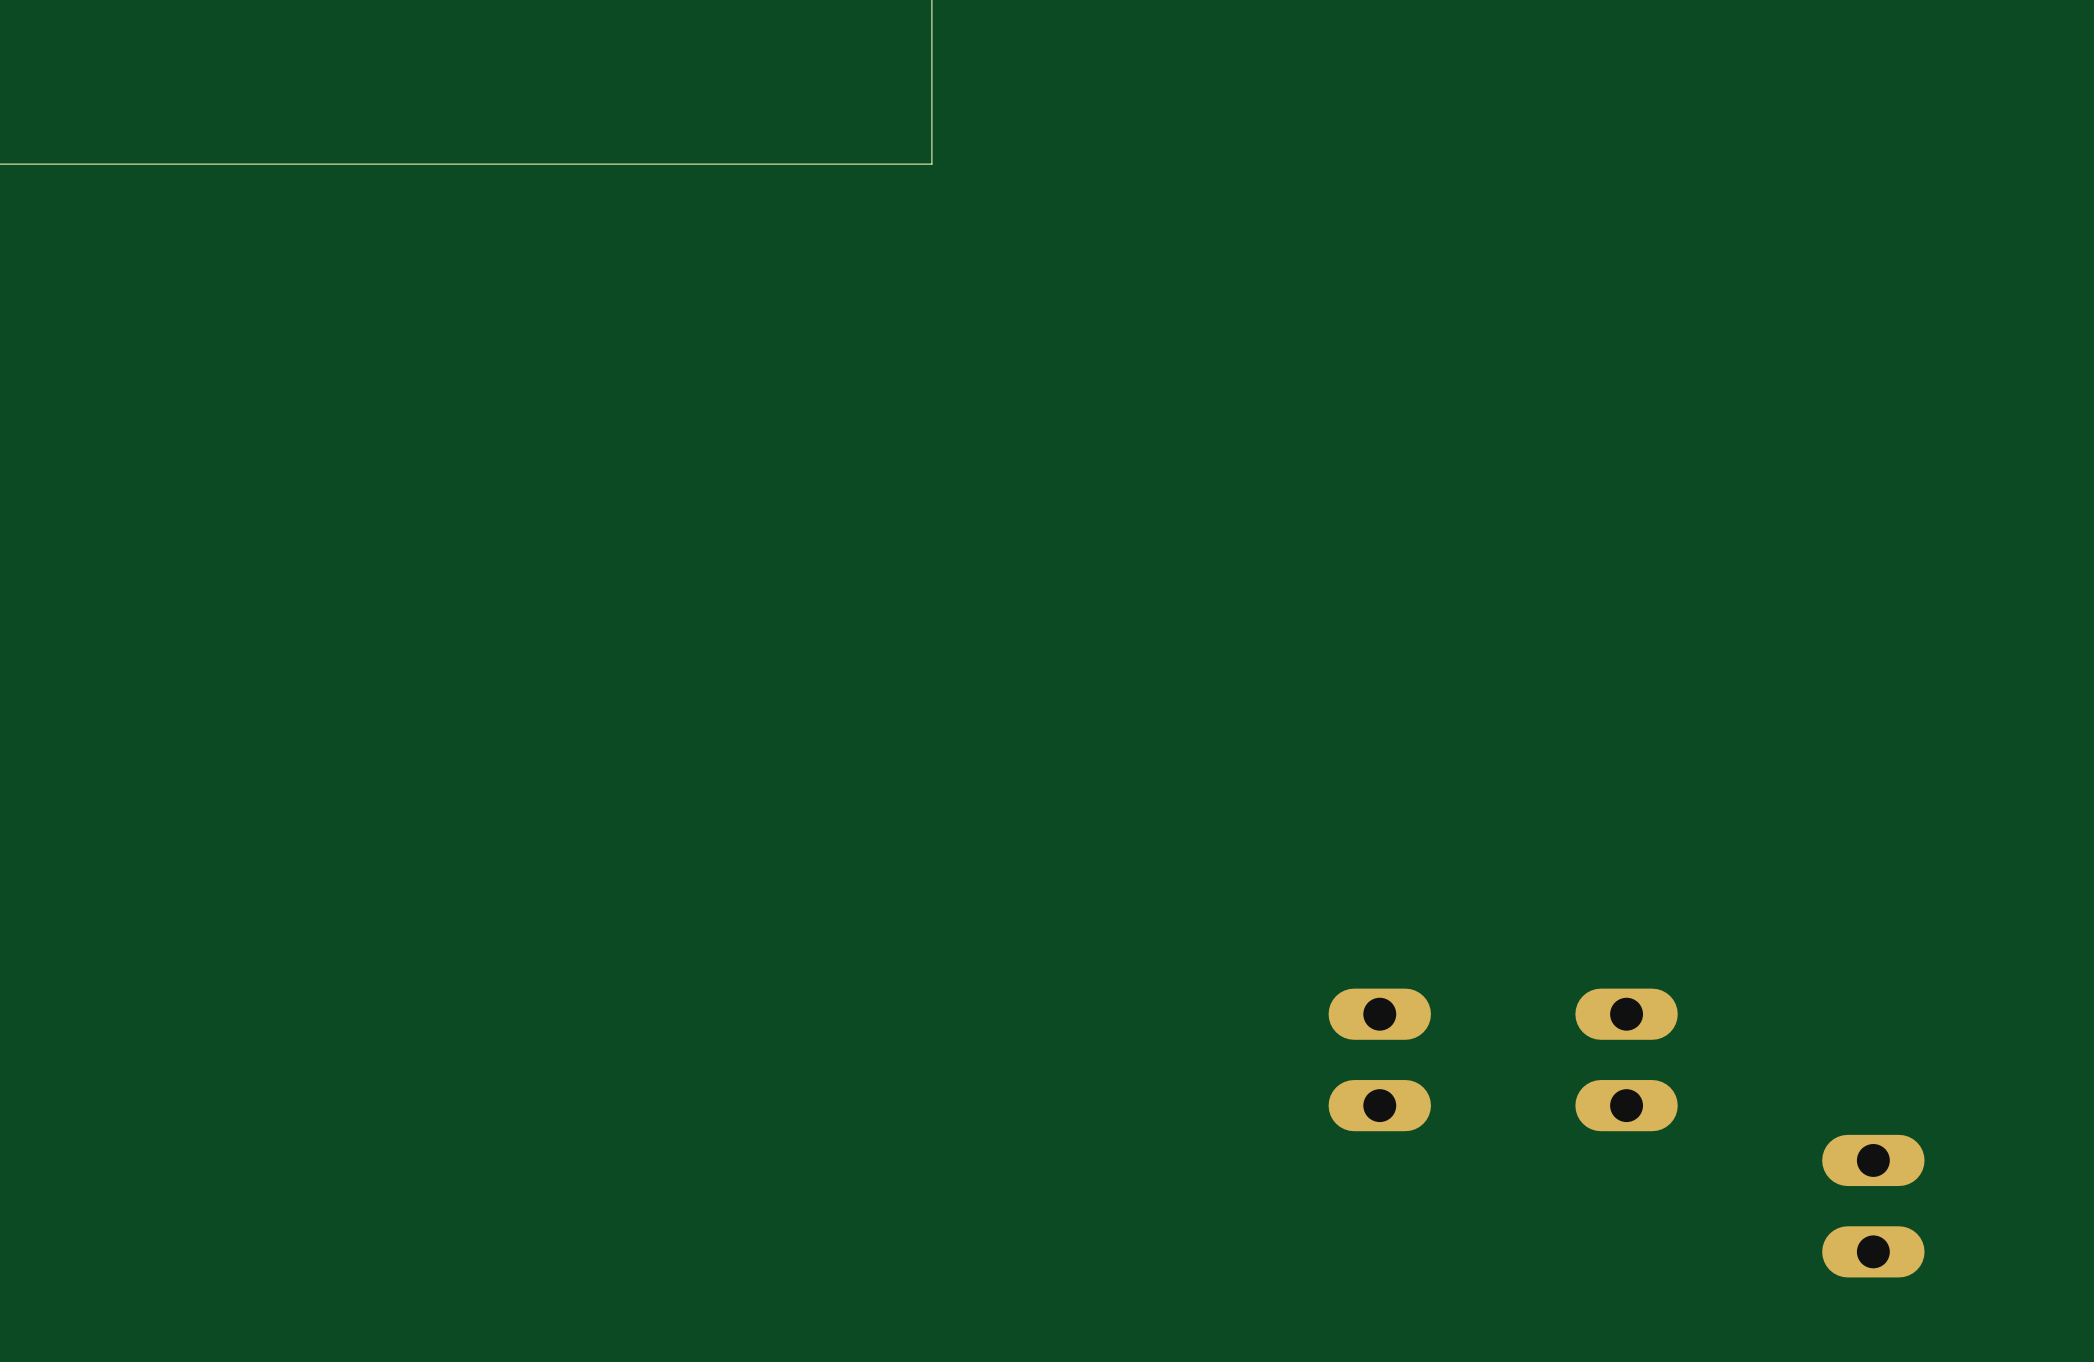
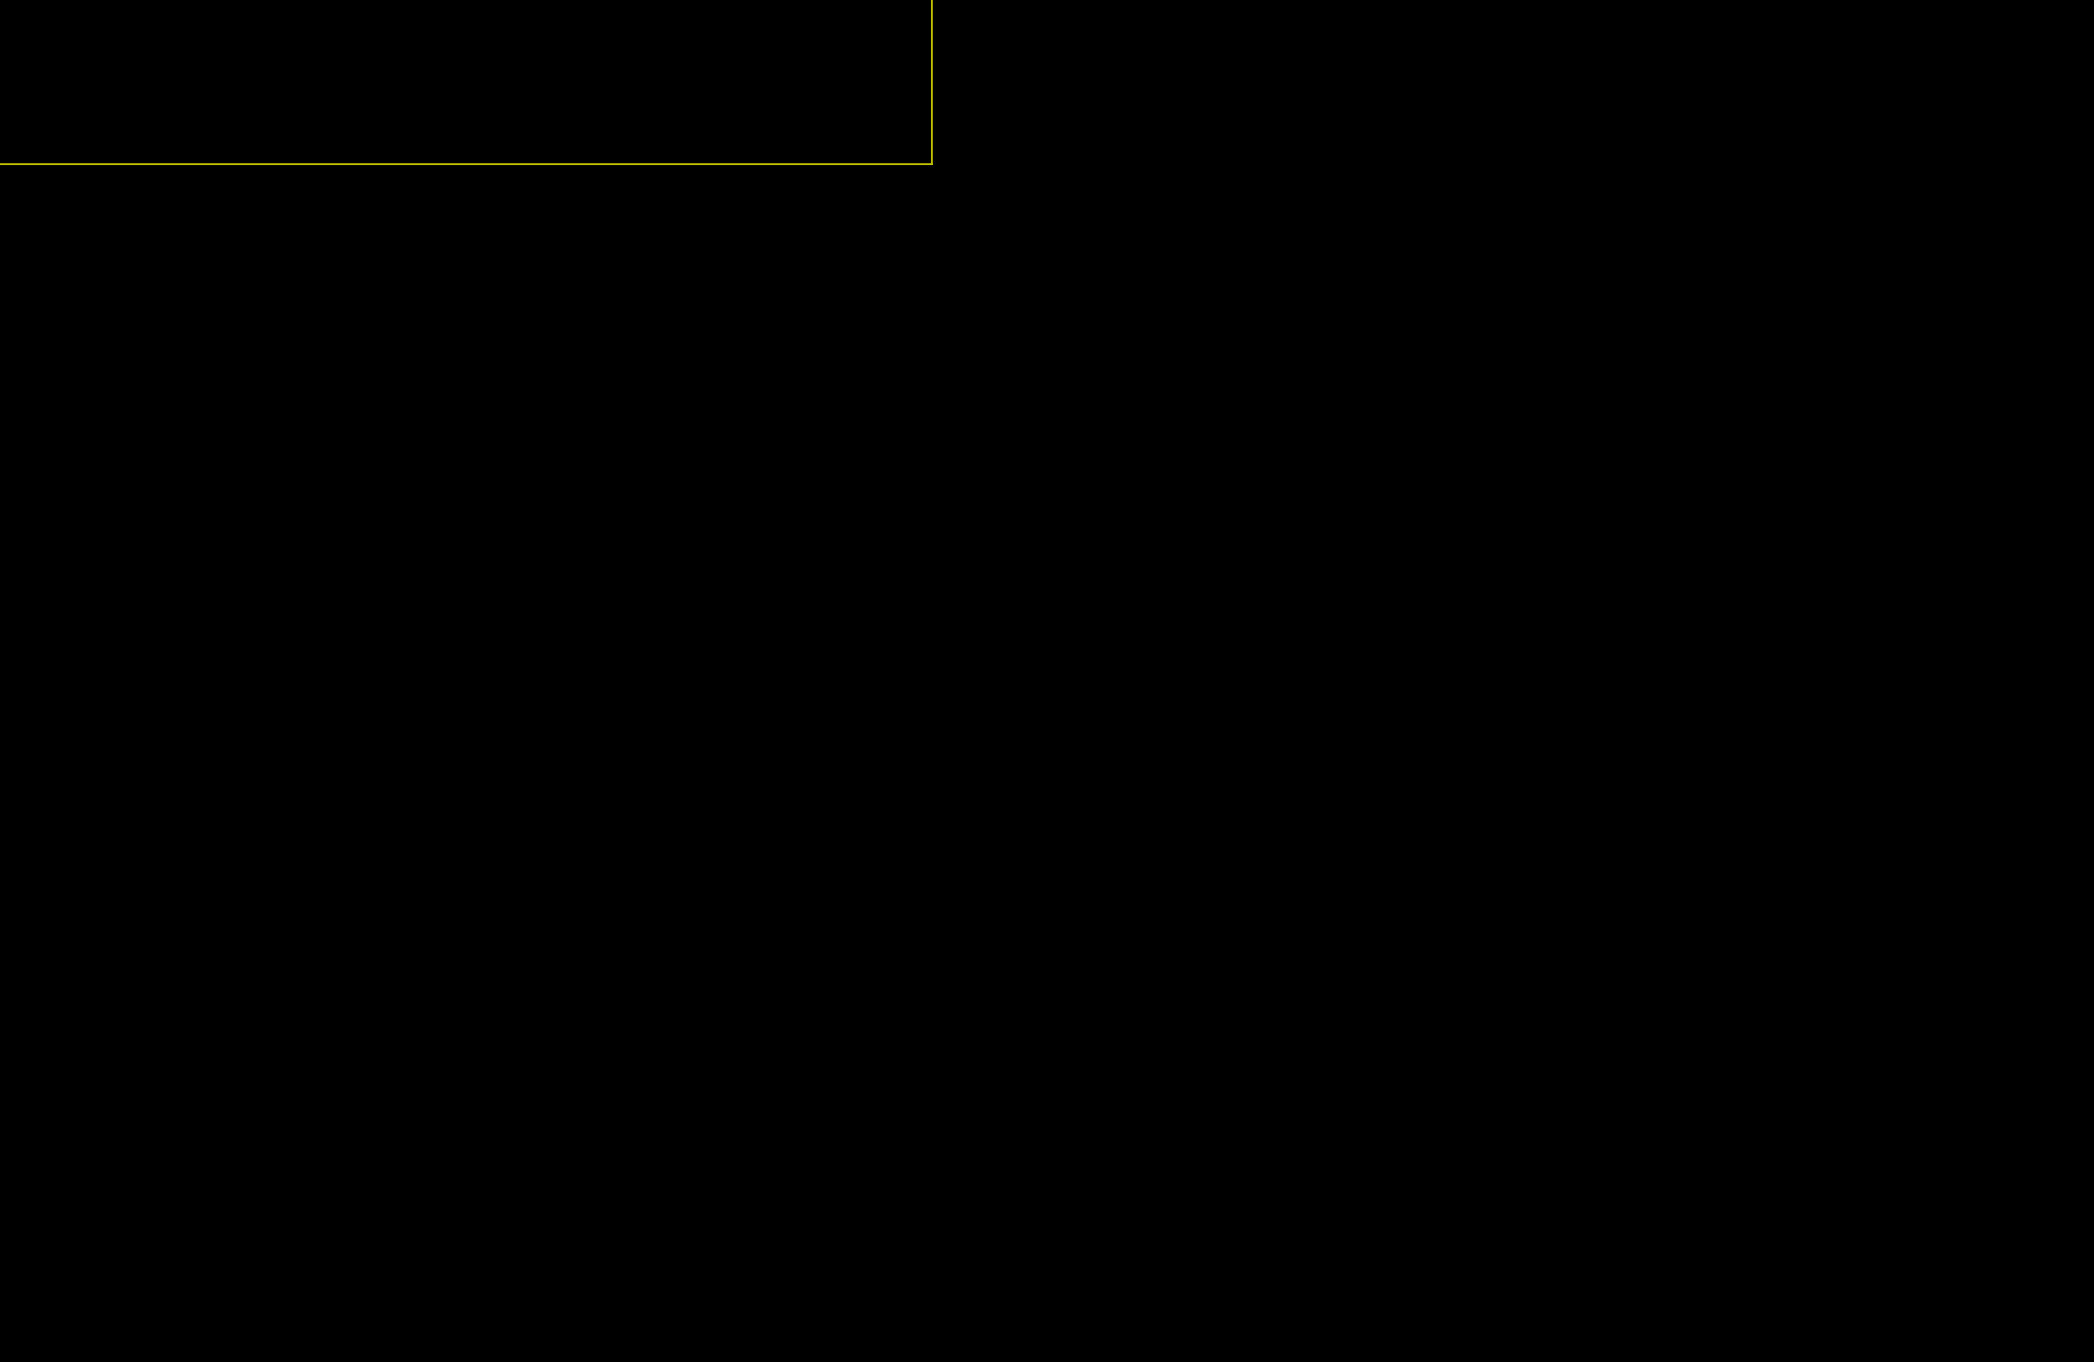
part: (1379, 1059) -> none
part: (1626, 1059) -> none
part: (1873, 1206) -> none

